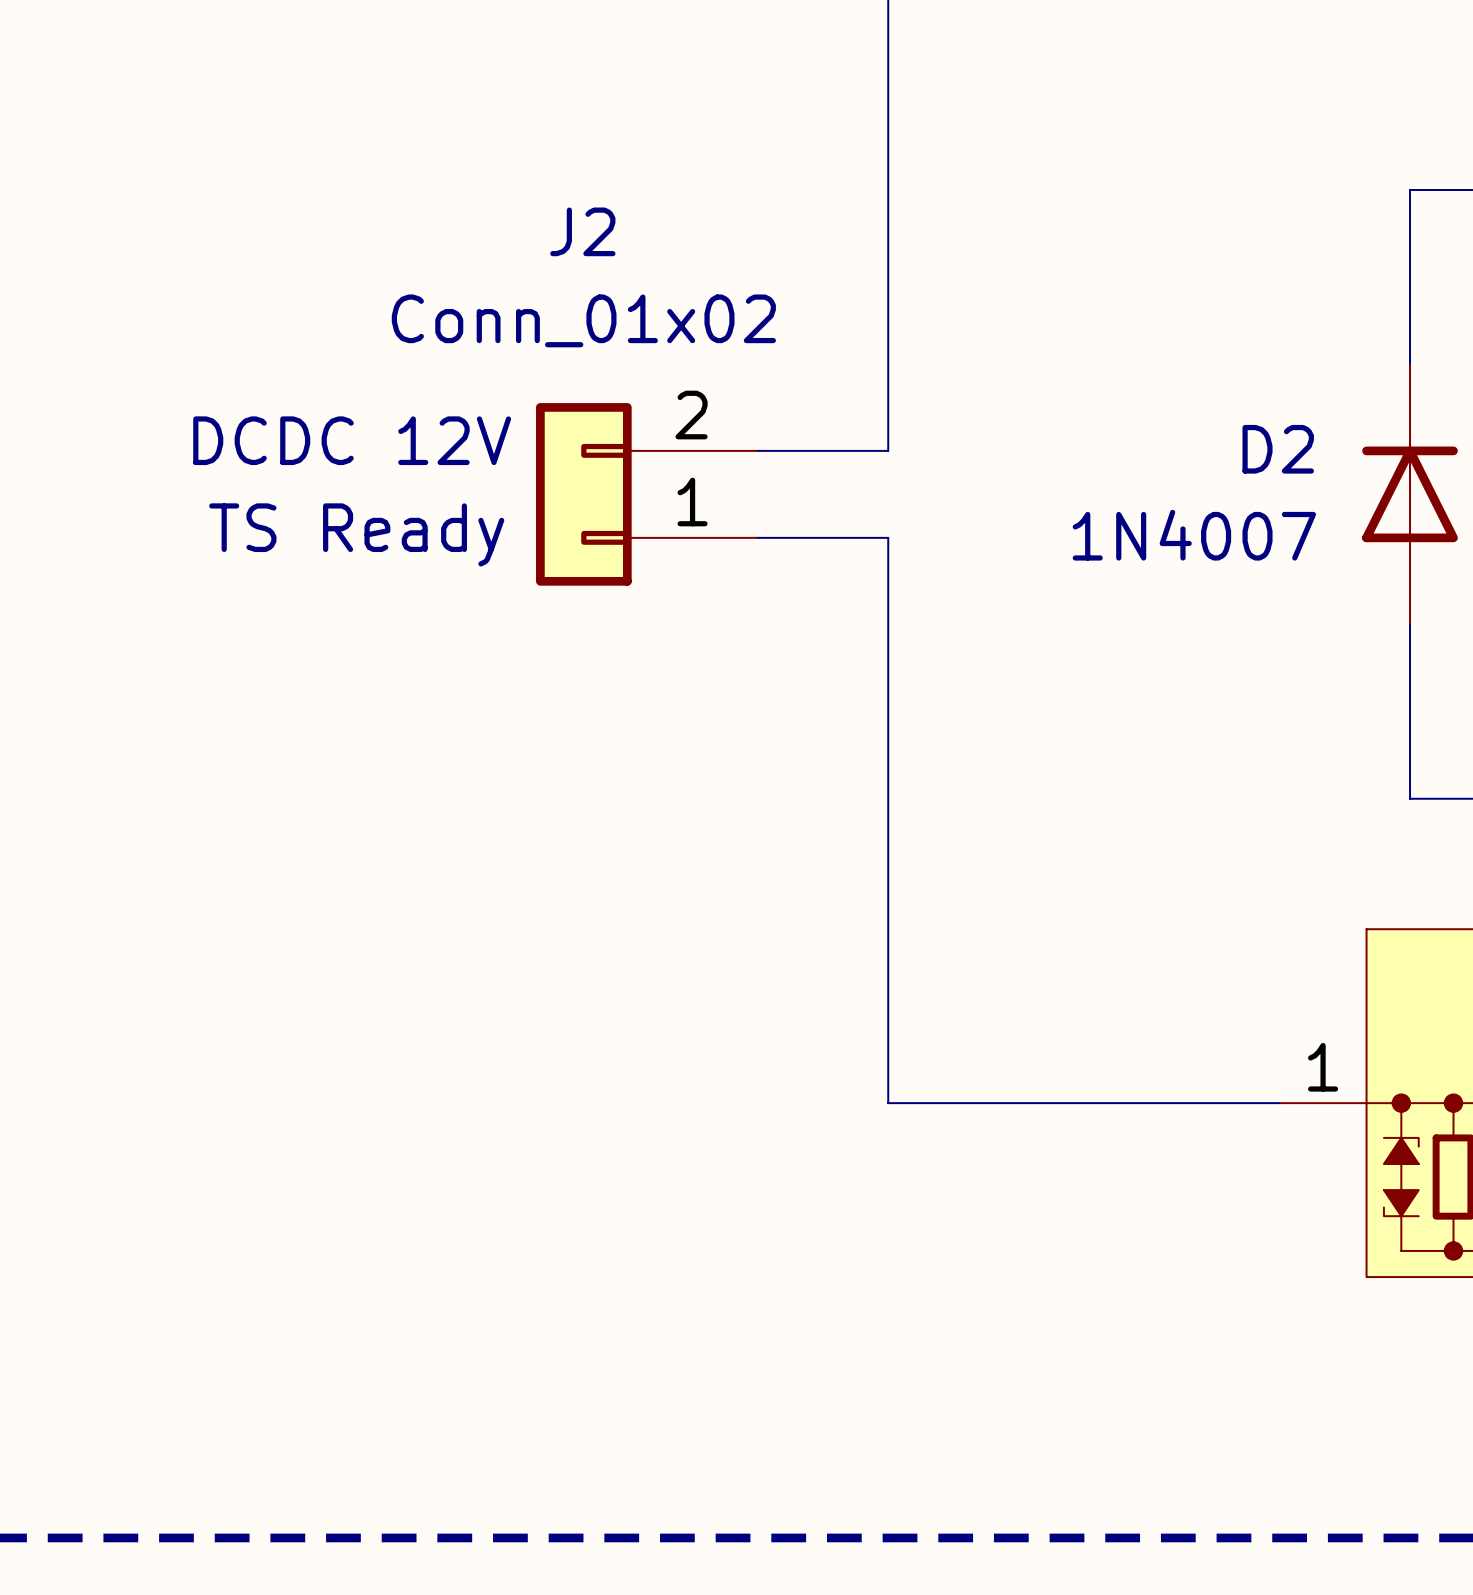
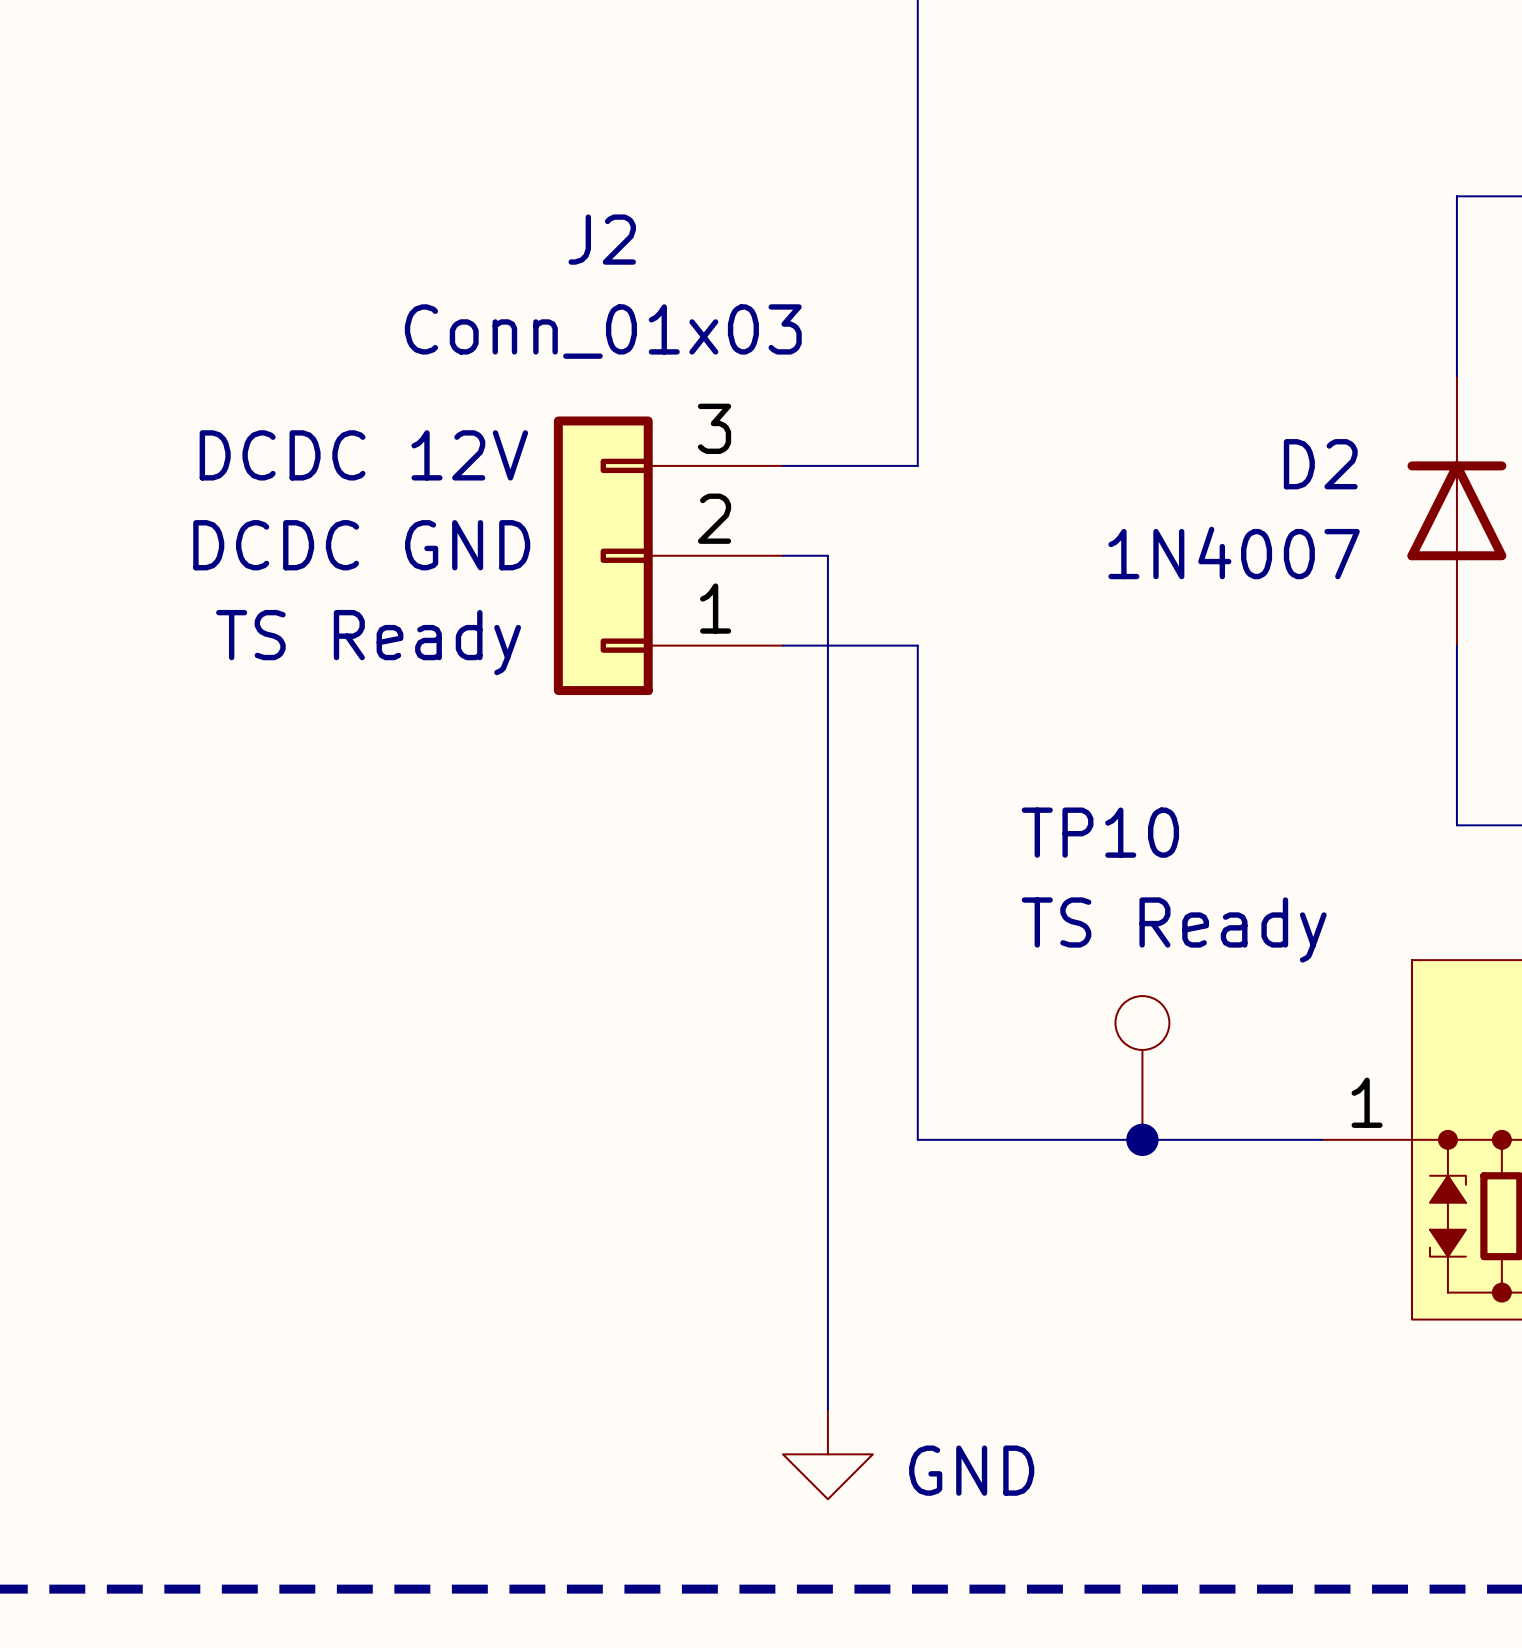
J2 value: Conn_01x02 (583, 320) -> Conn_01x03 (603, 331)
J2 symbol: [536, 403, 758, 586] -> [553, 416, 784, 696]
text: none -> DCDC GND (361, 545)
text position: TS Ready (356, 534) -> TS Ready (368, 642)
wire: (801, 537) (888, 537) (888, 624) -> (783, 645) (917, 645)
wire: none -> (827, 555) (827, 1409)
TP10: none -> TS Ready (1142, 1067)
junction: none -> (1142, 1139)
power symbol: none -> GND (827, 1454)

